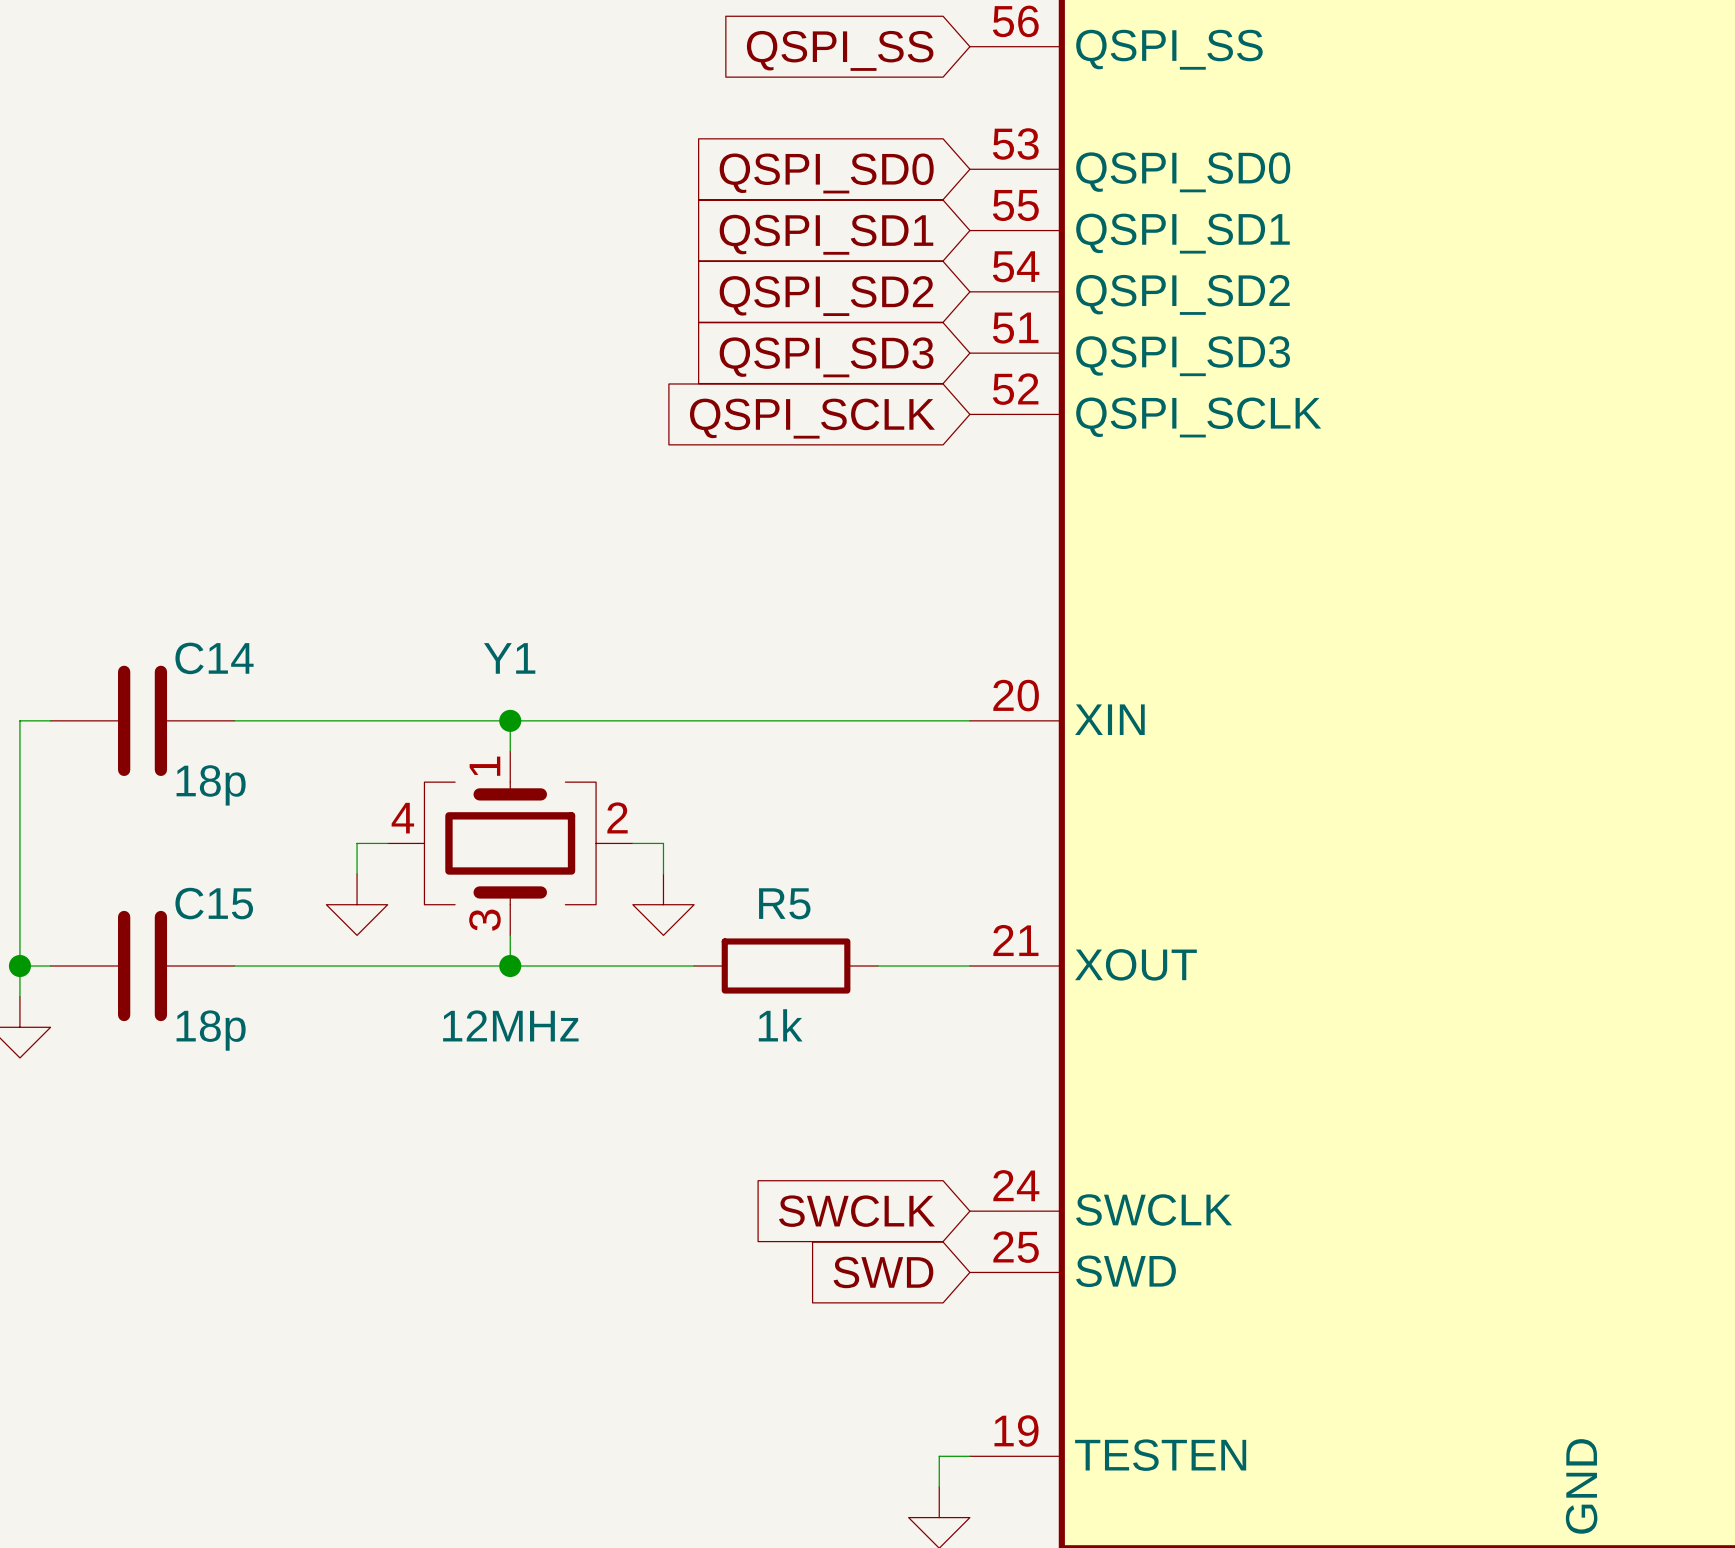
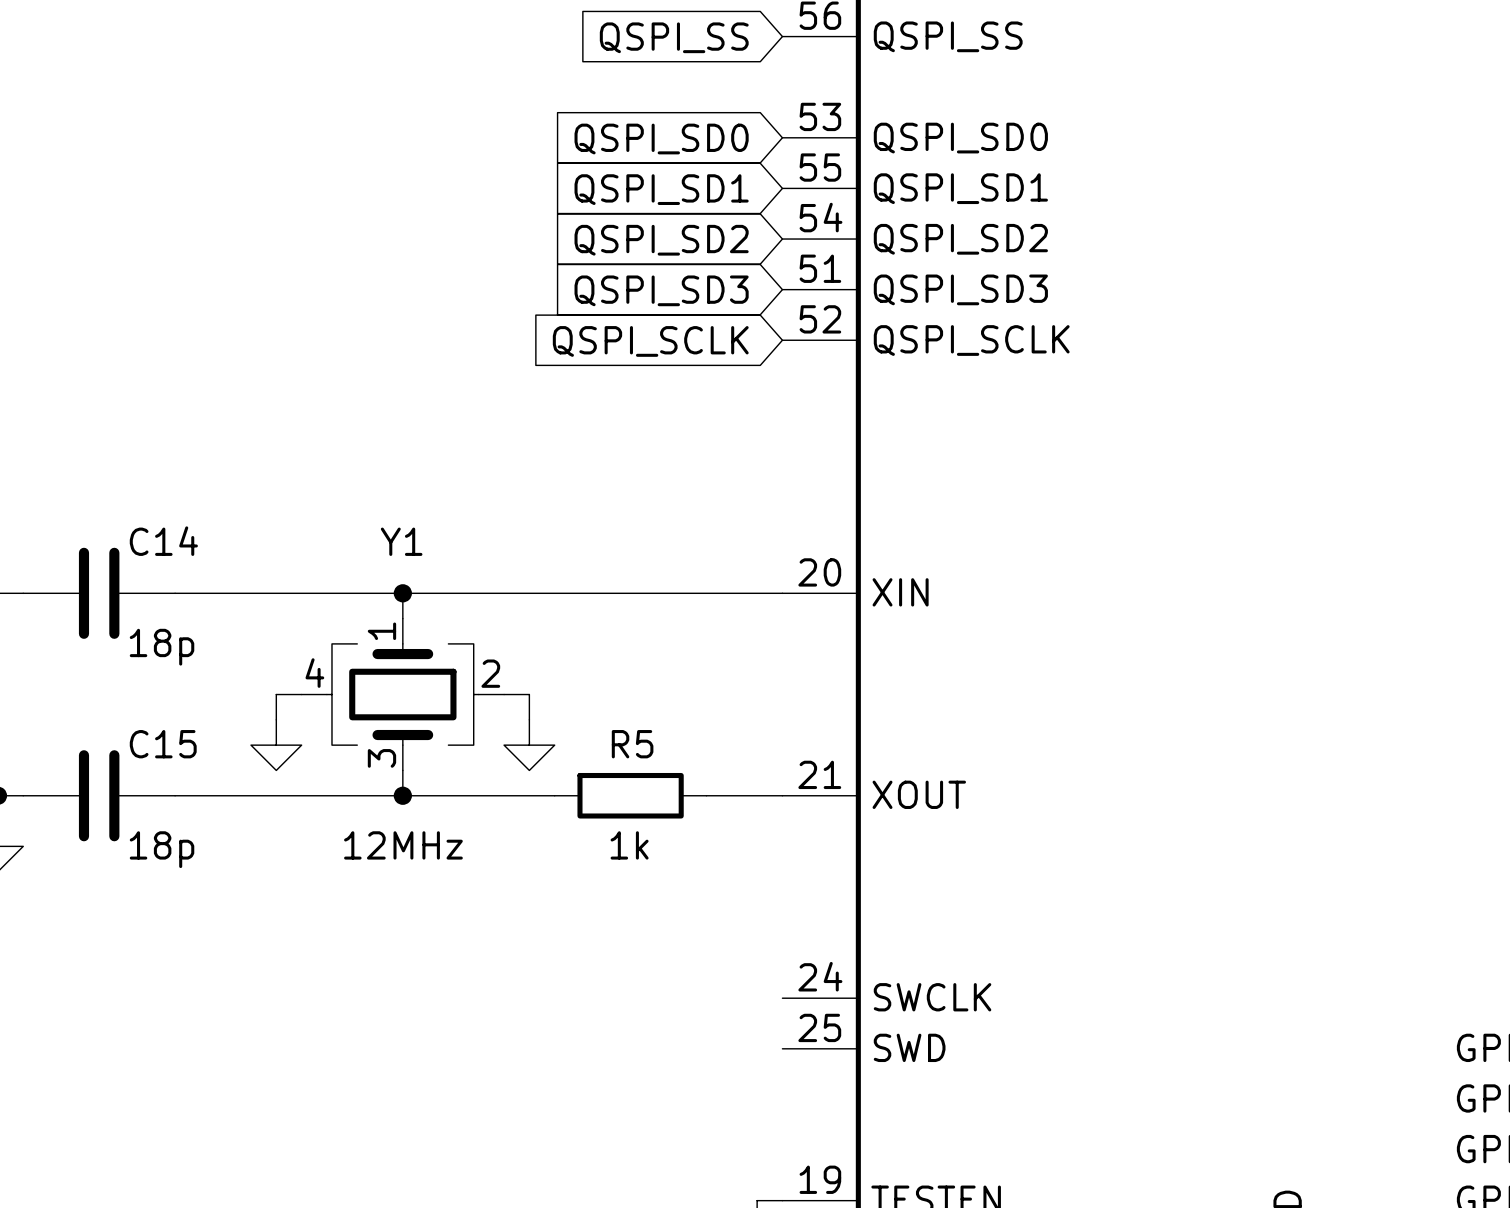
global label: SWCLK (856, 1211) -> none
global label: SWD (883, 1272) -> none

